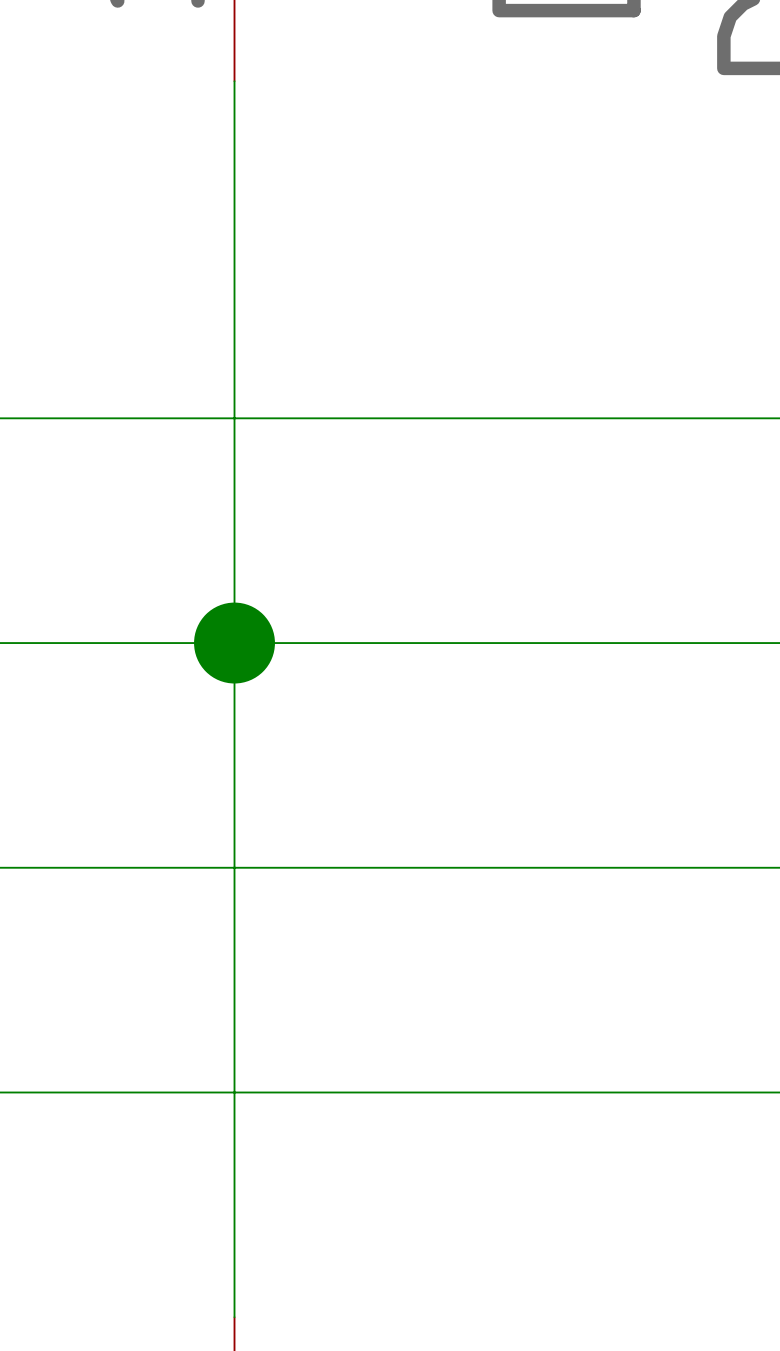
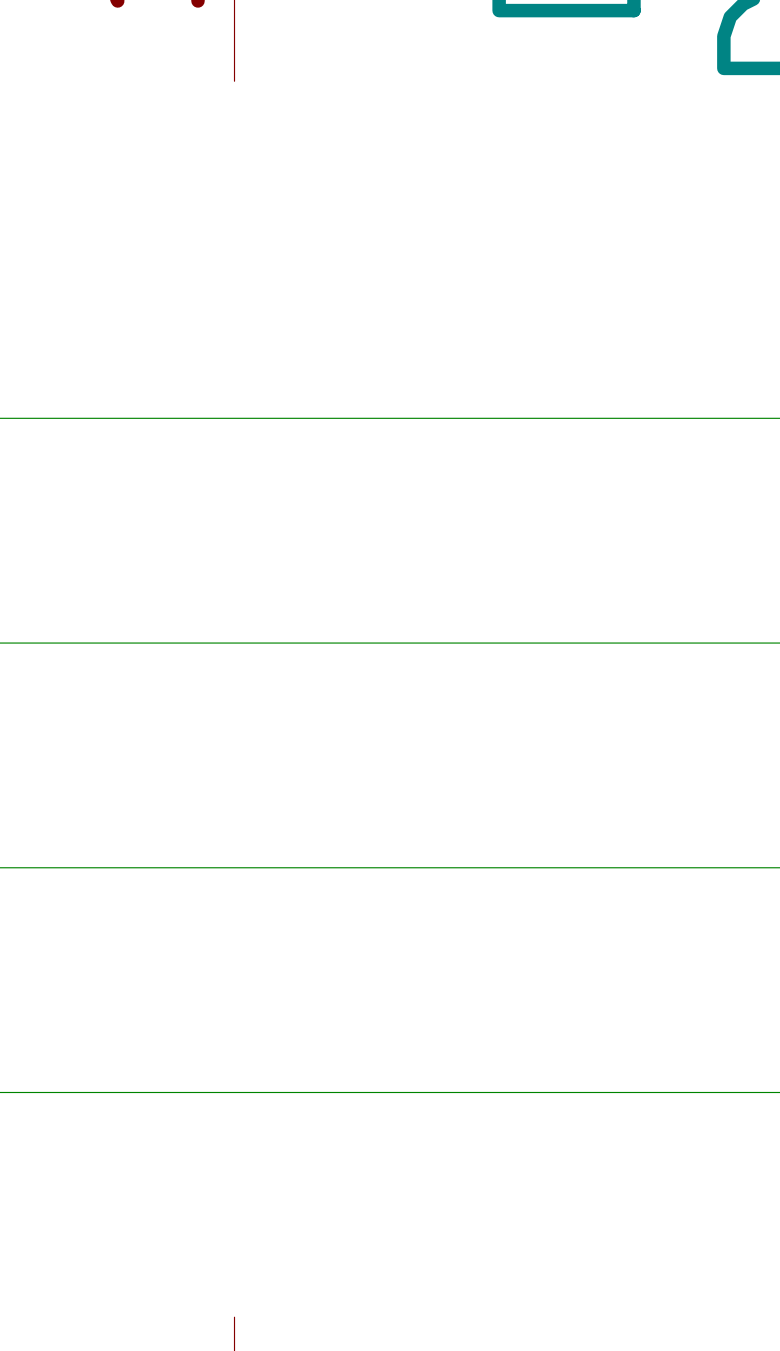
wire: (234, 81) (234, 1317) -> none
junction: (234, 643) -> none

